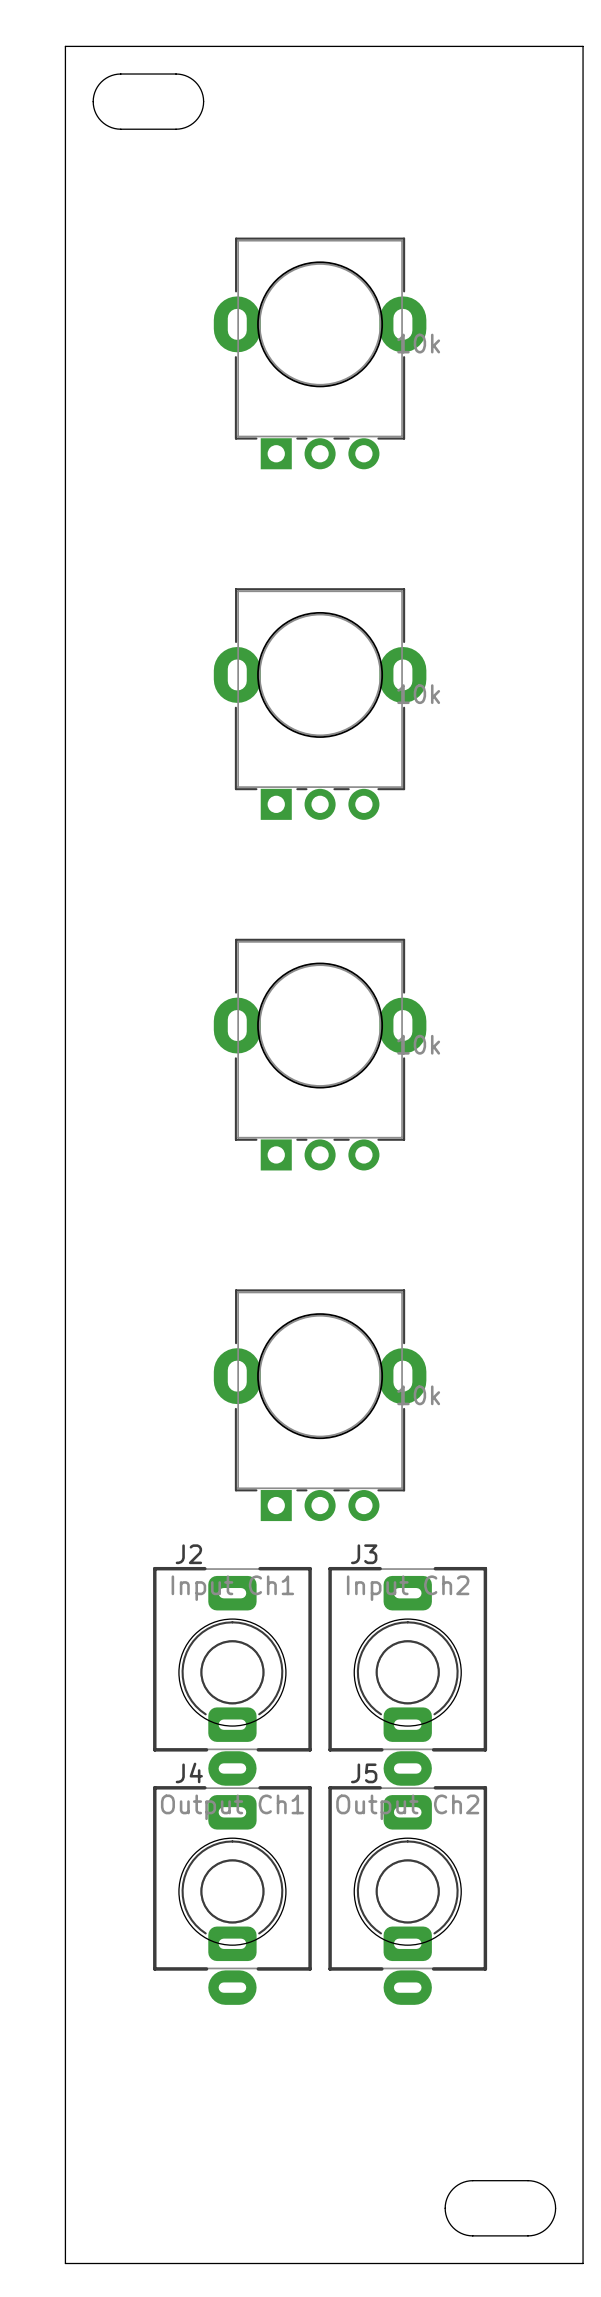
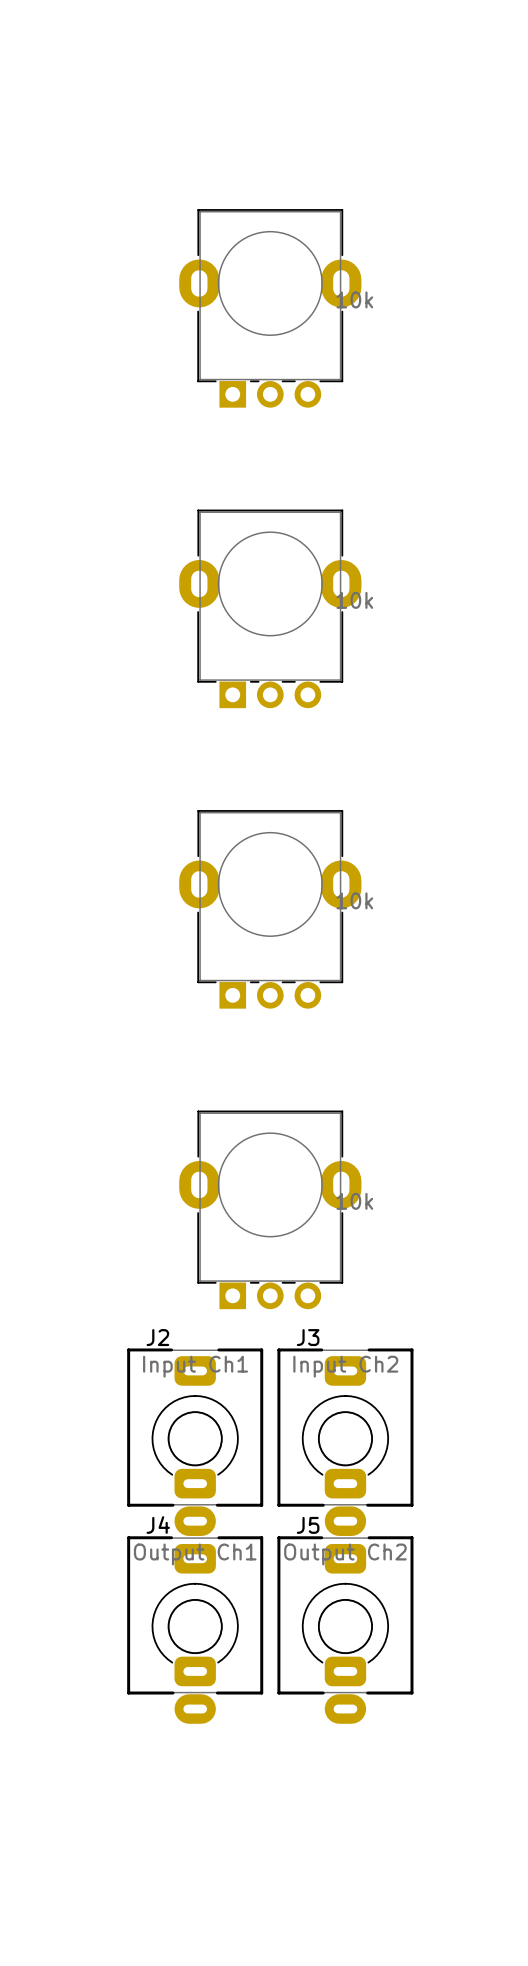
board edge: (65, 46) (583, 46) (583, 2263) (65, 2263) (65, 46) -> none
board edge: (120, 74) (176, 74) (187, 76) (195, 82) (202, 92) (203, 104) (200, 113) (190, 124) (179, 129) (120, 129) (108, 126) (101, 121) (95, 113) (93, 104) (93, 95) (97, 86) (103, 80) (111, 75) (120, 74) -> none
round board edge: [257, 261, 384, 388] -> none
round board edge: [257, 611, 384, 738] -> none
round board edge: [257, 962, 384, 1089] -> none
round board edge: [257, 1313, 384, 1440] -> none
round board edge: [178, 1618, 287, 1727] -> none
round board edge: [353, 1618, 462, 1727] -> none
round board edge: [178, 1837, 287, 1946] -> none
round board edge: [353, 1837, 462, 1946] -> none
board edge: (472, 2180) (527, 2180) (539, 2183) (549, 2191) (554, 2199) (555, 2211) (552, 2220) (542, 2231) (531, 2235) (472, 2235) (460, 2233) (453, 2227) (447, 2220) (445, 2211) (445, 2202) (449, 2193) (455, 2186) (463, 2182) (472, 2180) -> none

